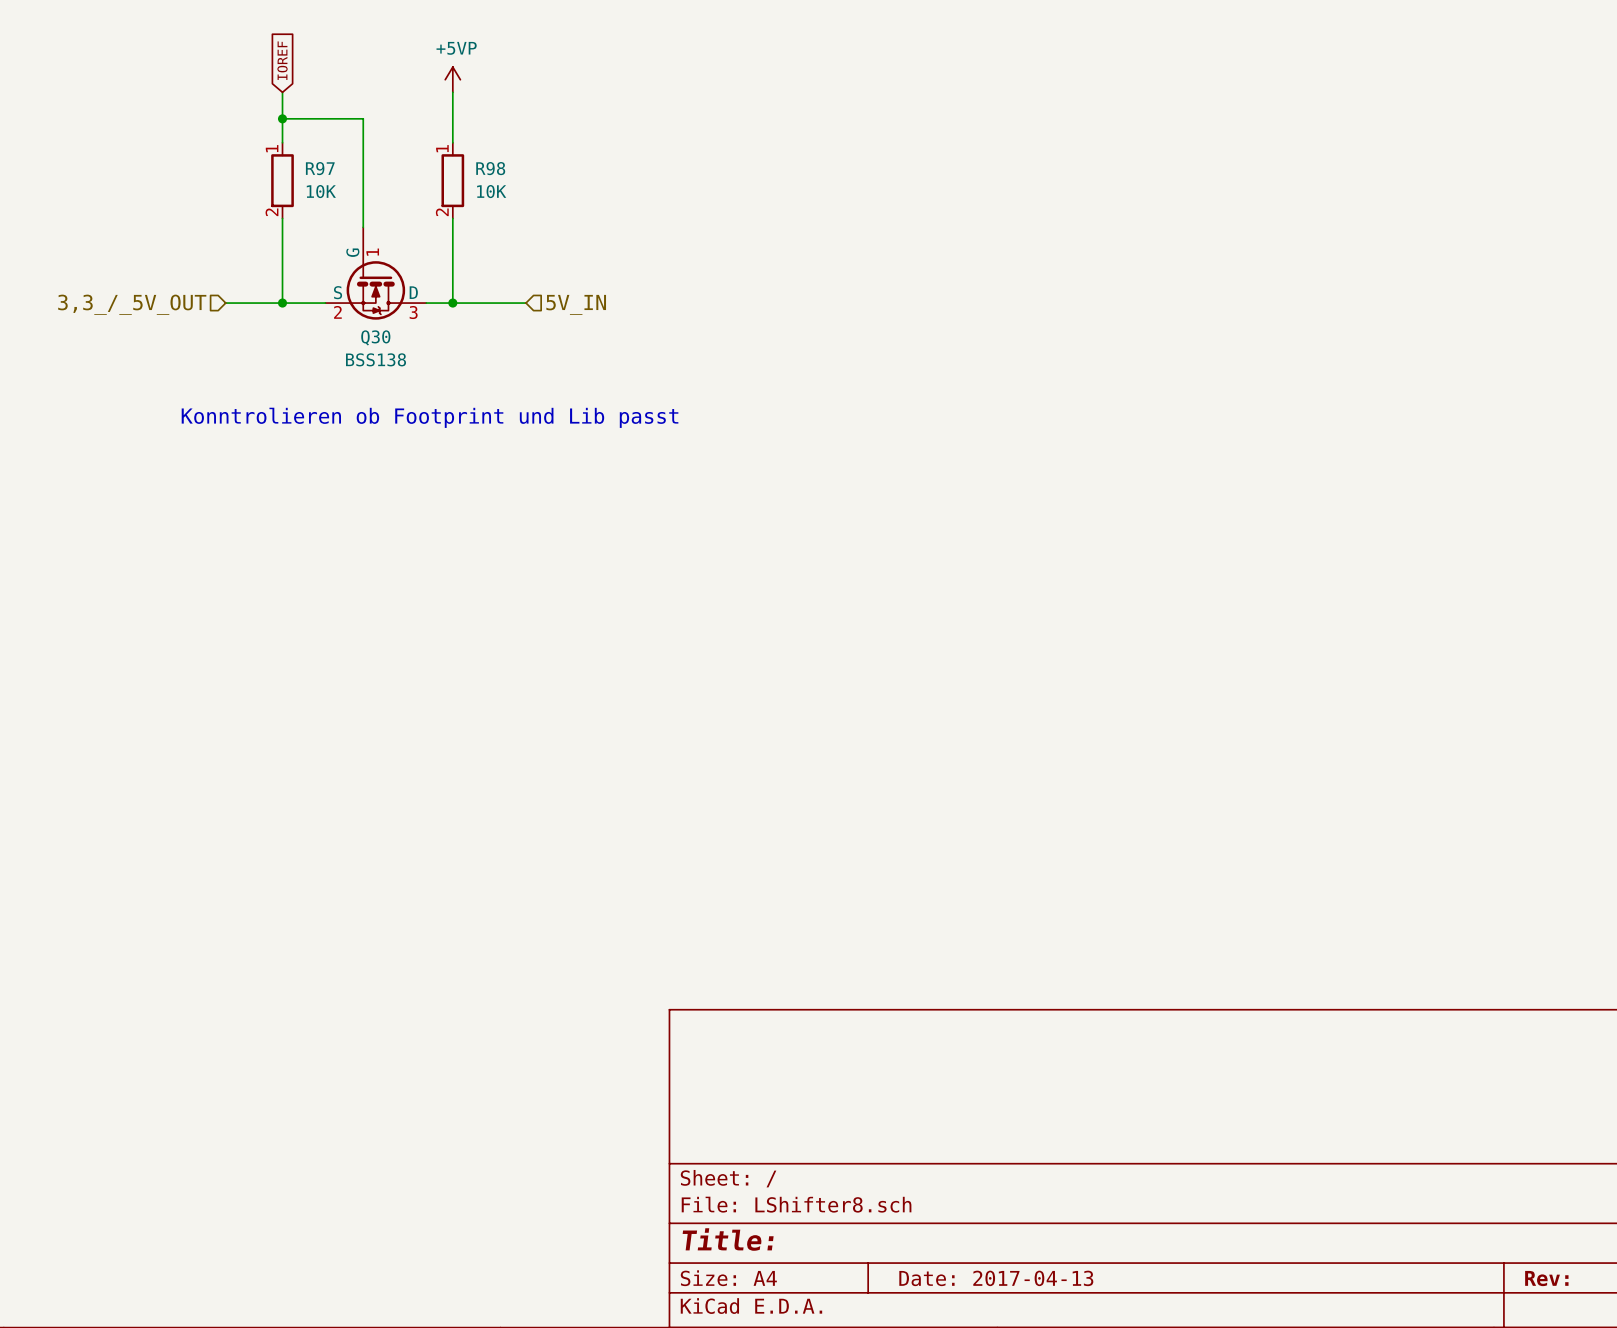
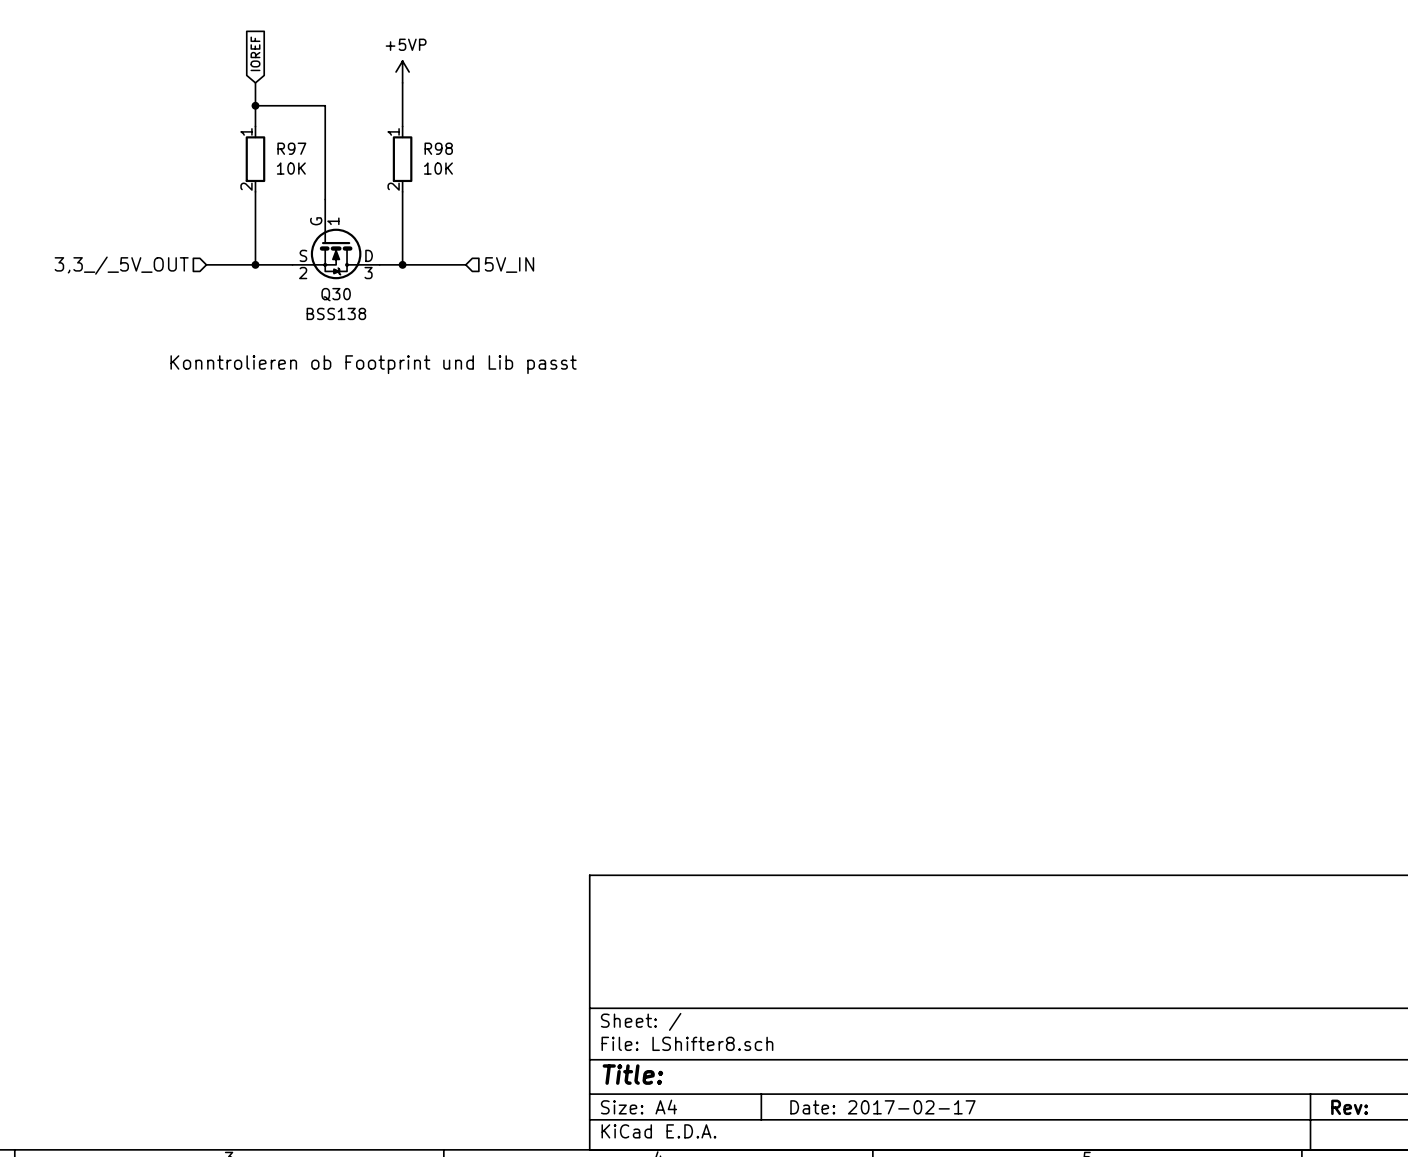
title block: Date: 2017-04-13 (996, 1278) -> Date: 2017-02-17 (882, 1107)

